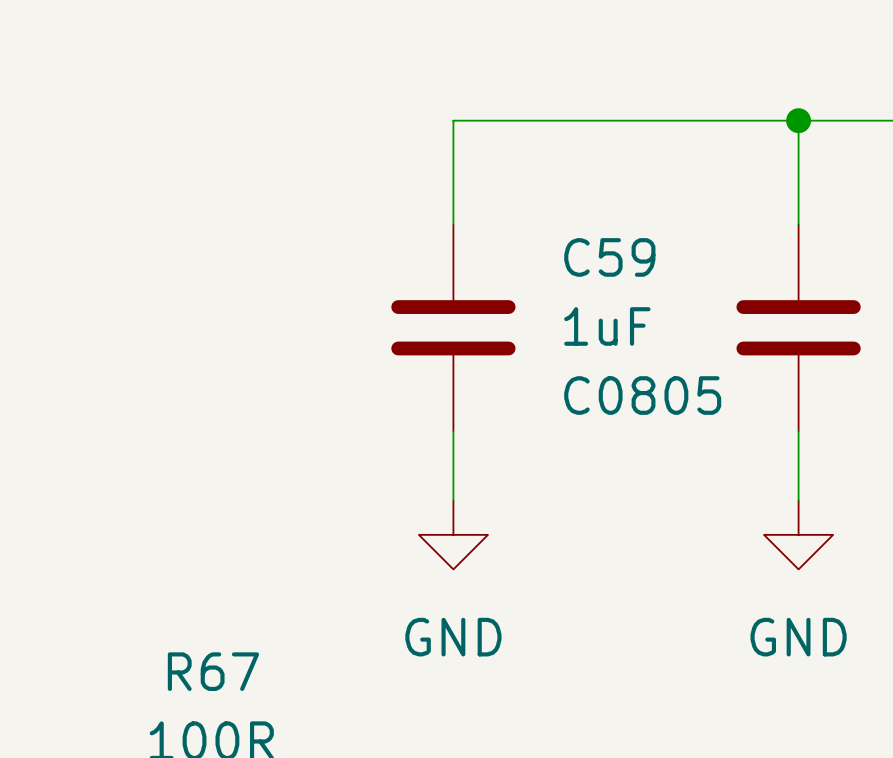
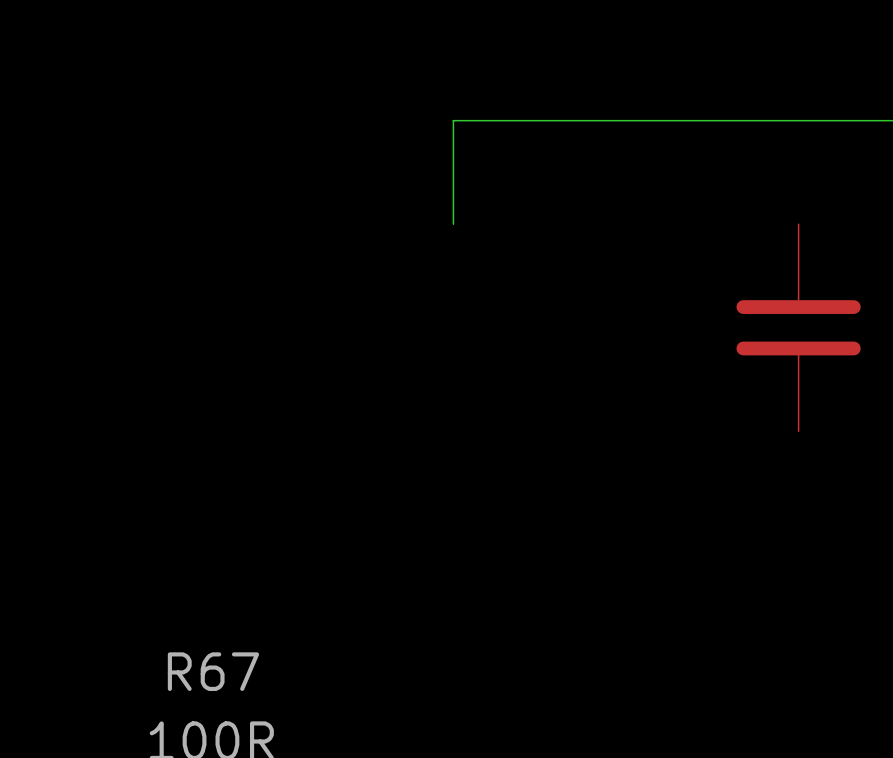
wire: (798, 120) (798, 224) -> none
junction: (798, 120) -> none
C59: 1uF (453, 327) -> none
wire: (453, 431) (453, 500) -> none
wire: (798, 431) (798, 500) -> none
power symbol: GND (453, 534) -> none
power symbol: GND (798, 534) -> none

